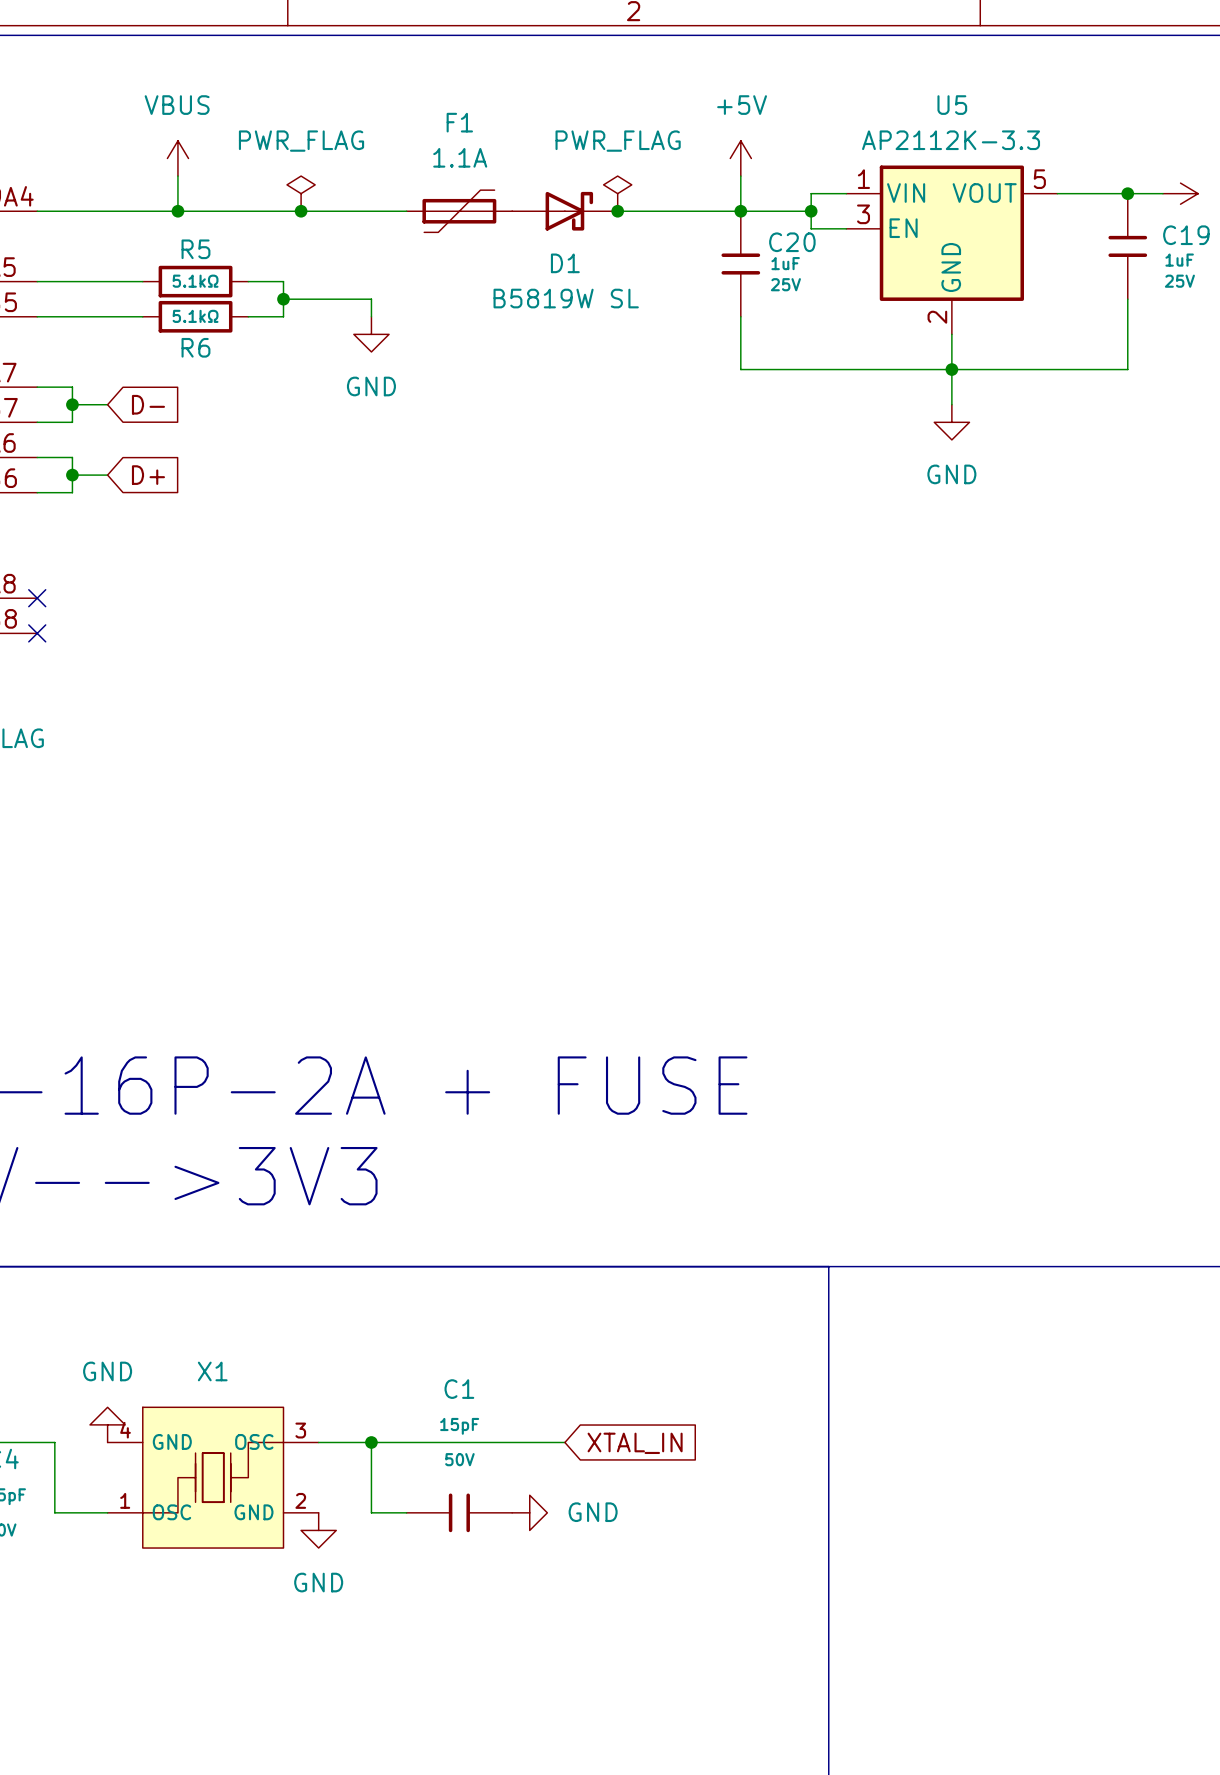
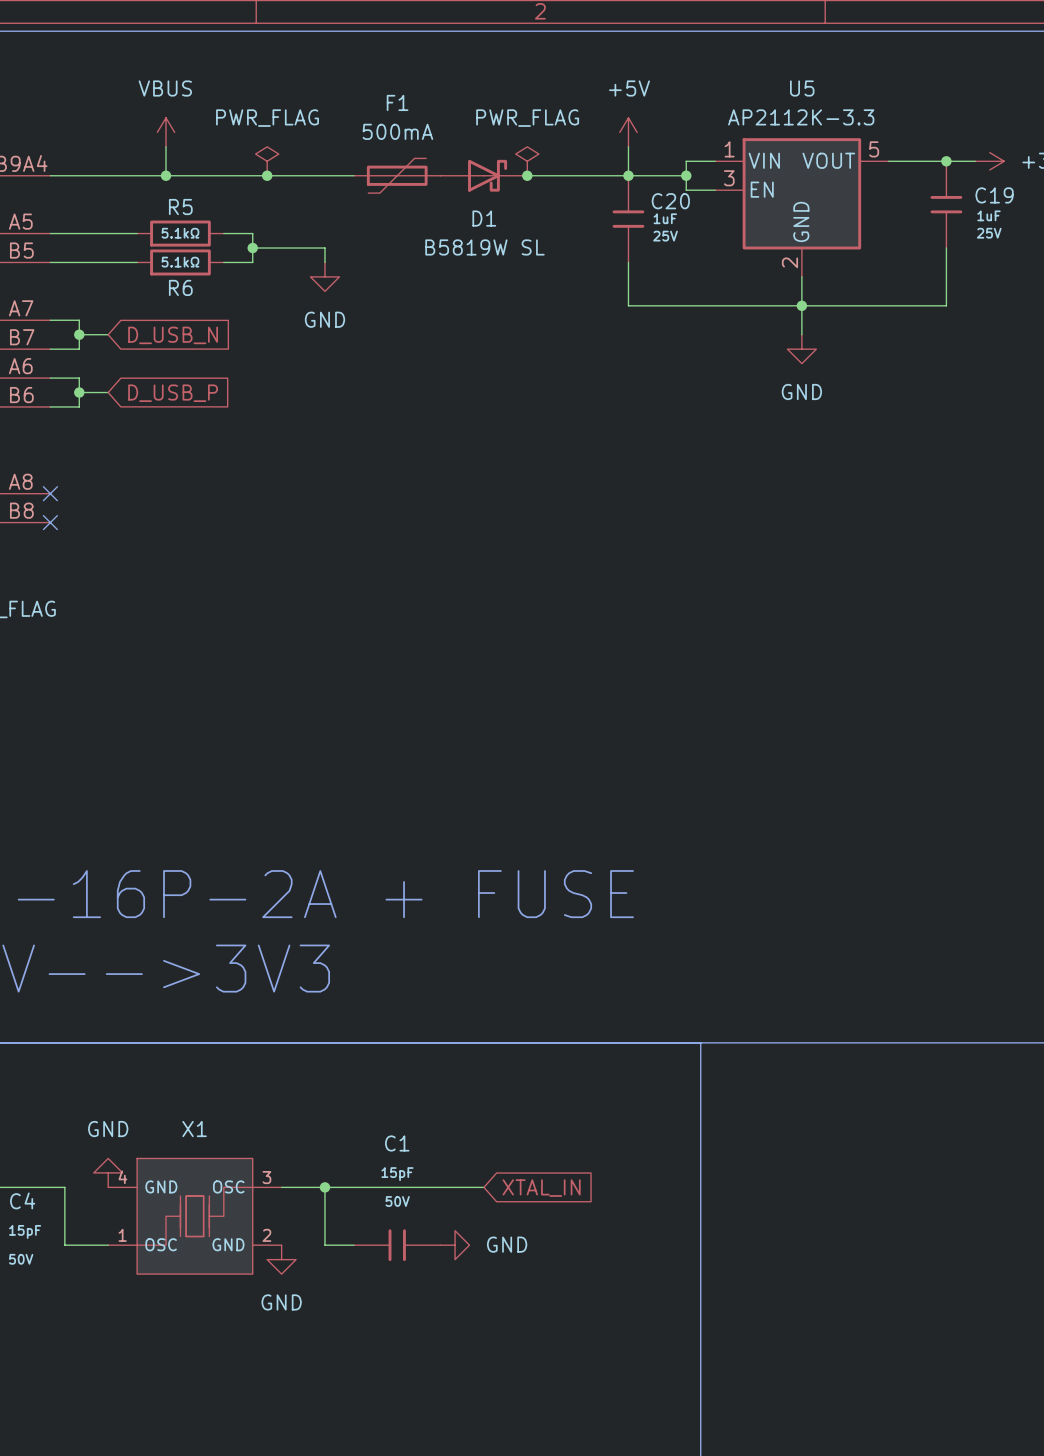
F1 value: 1.1A (460, 157) -> 500mA (397, 131)
global label: D- (148, 404) -> D_USB_N (173, 335)
global label: D+ (148, 475) -> D_USB_P (173, 393)

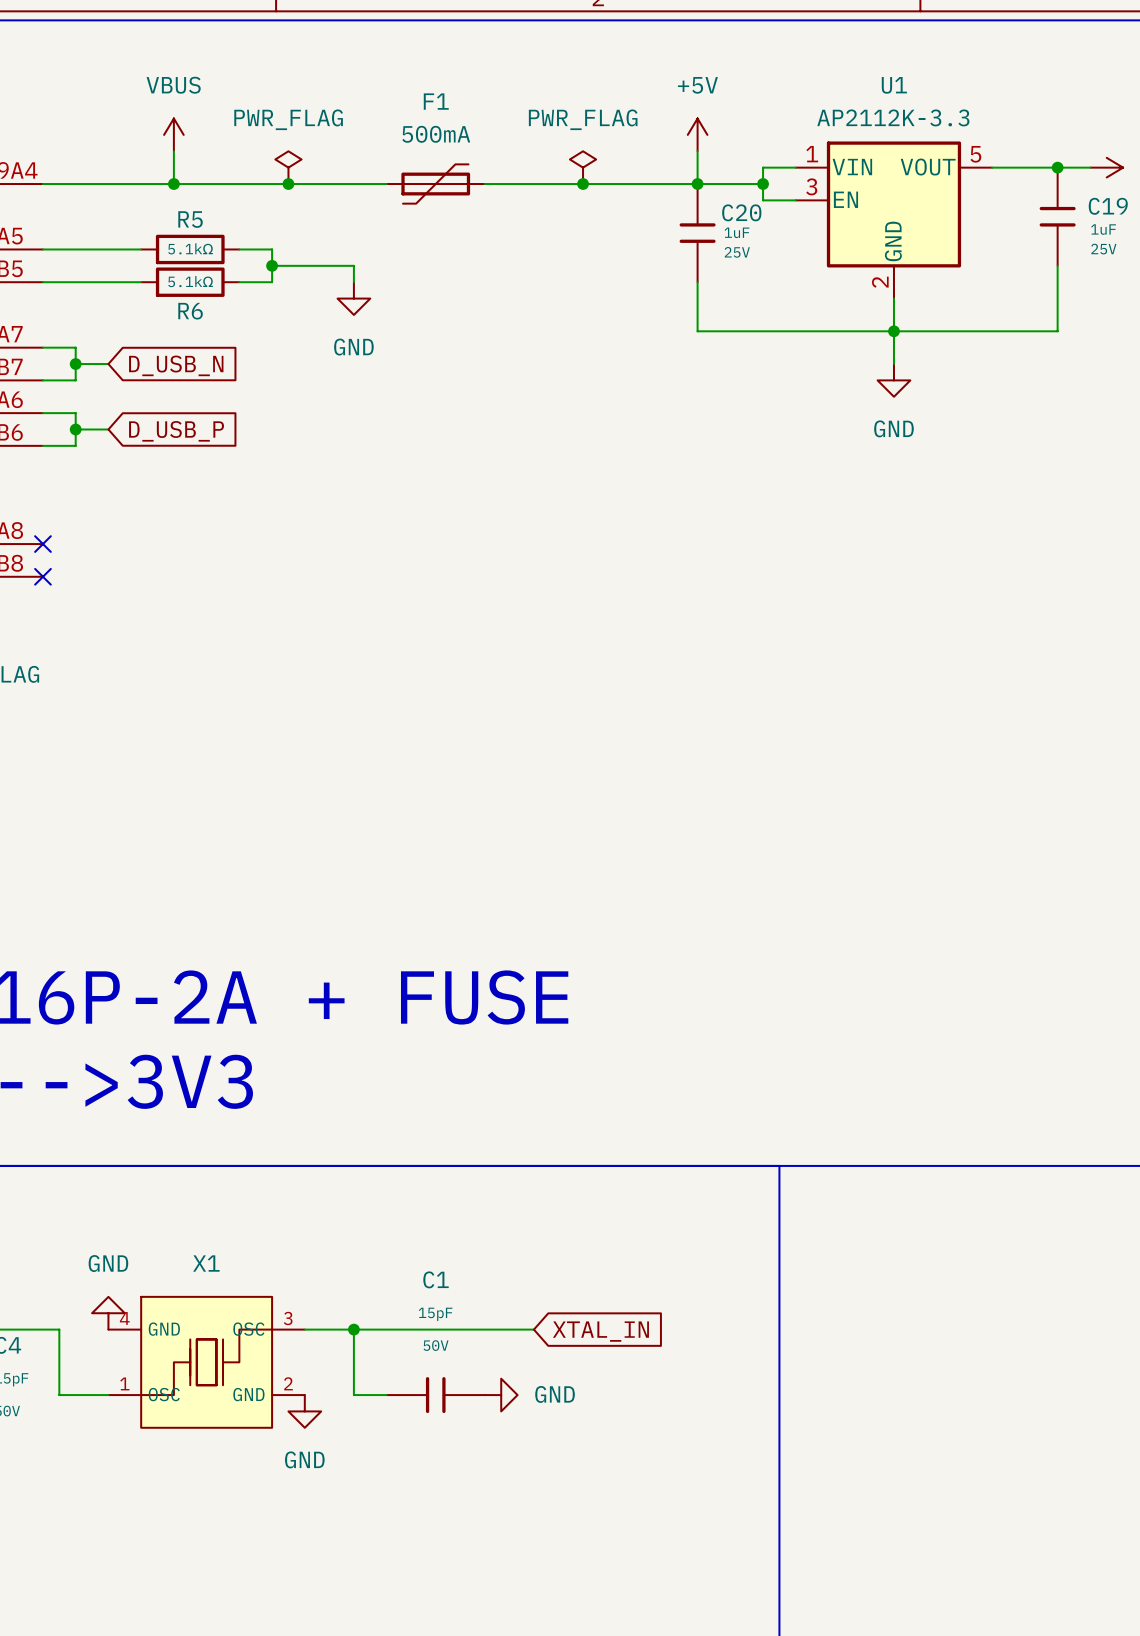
U5 name: U5 (802, 88) -> U1 (894, 85)
D1: B5819W SL (483, 175) -> none

